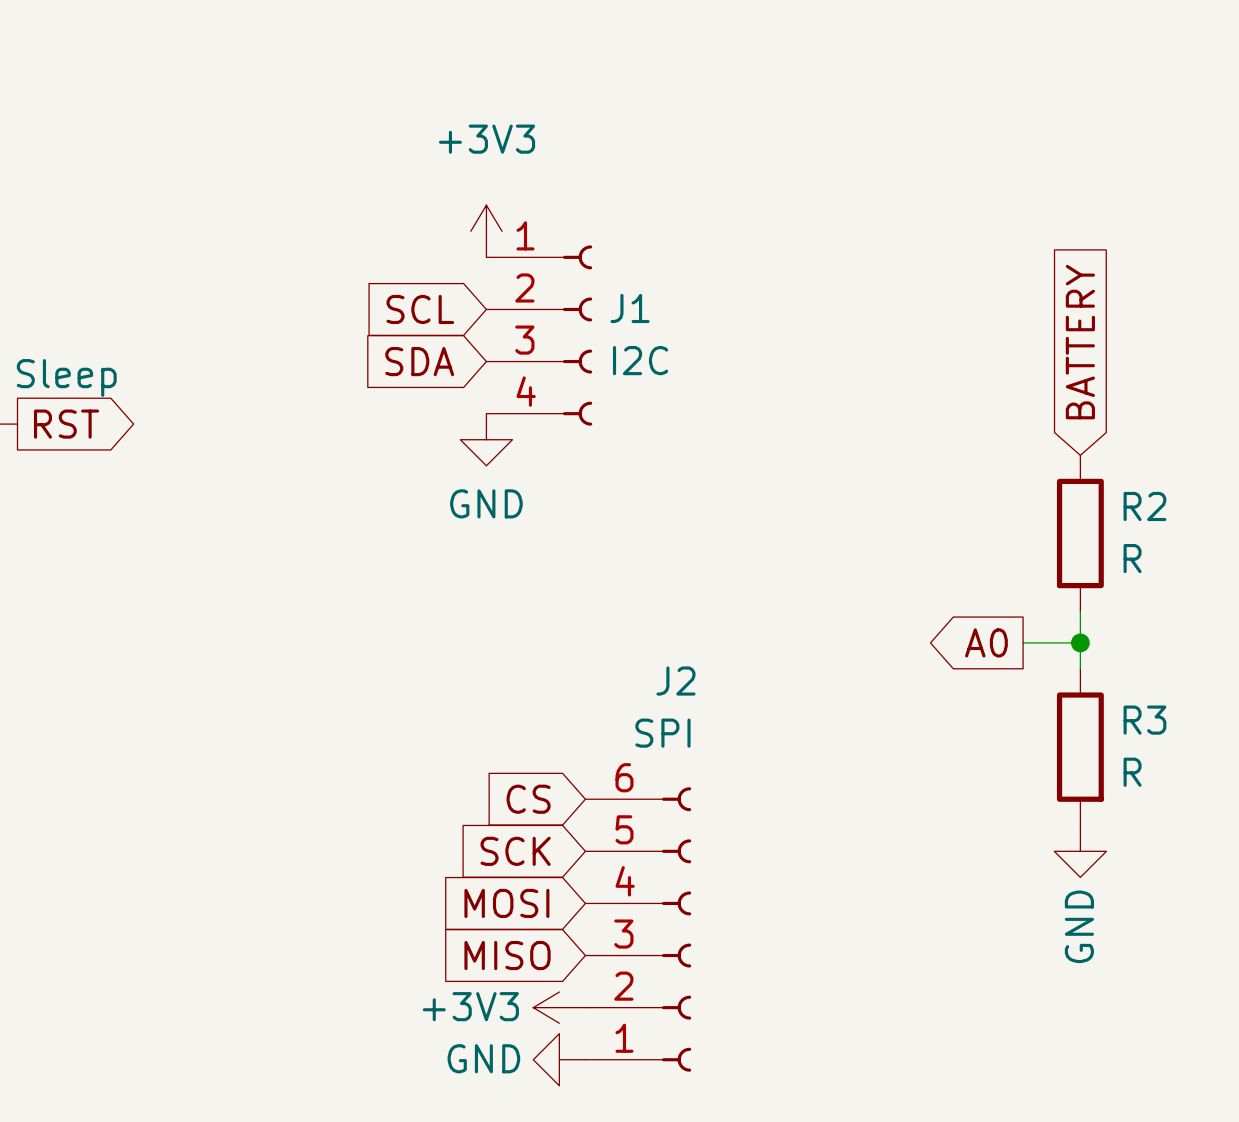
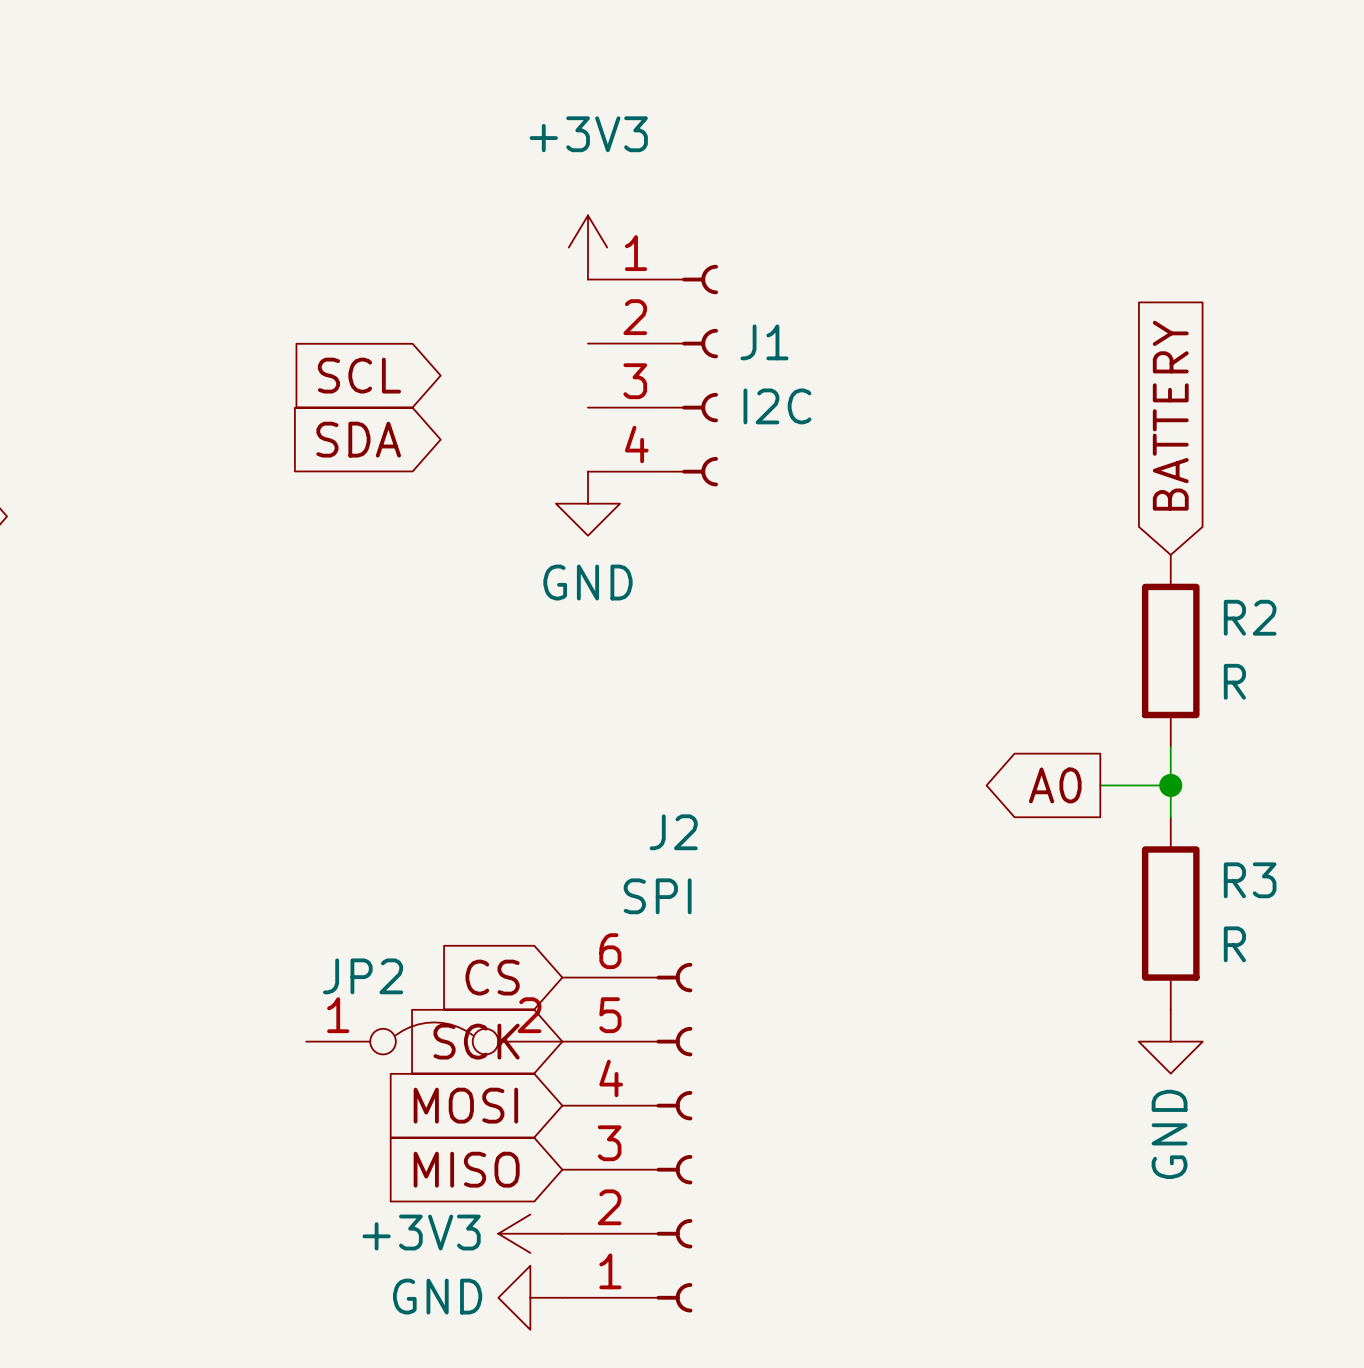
power symbol position: +3V3 (486, 231) -> +3V3 (587, 247)
J1 position: (539, 335) -> (652, 375)
power symbol position: GND (486, 439) -> GND (587, 503)
JP2: none -> (434, 1038)

